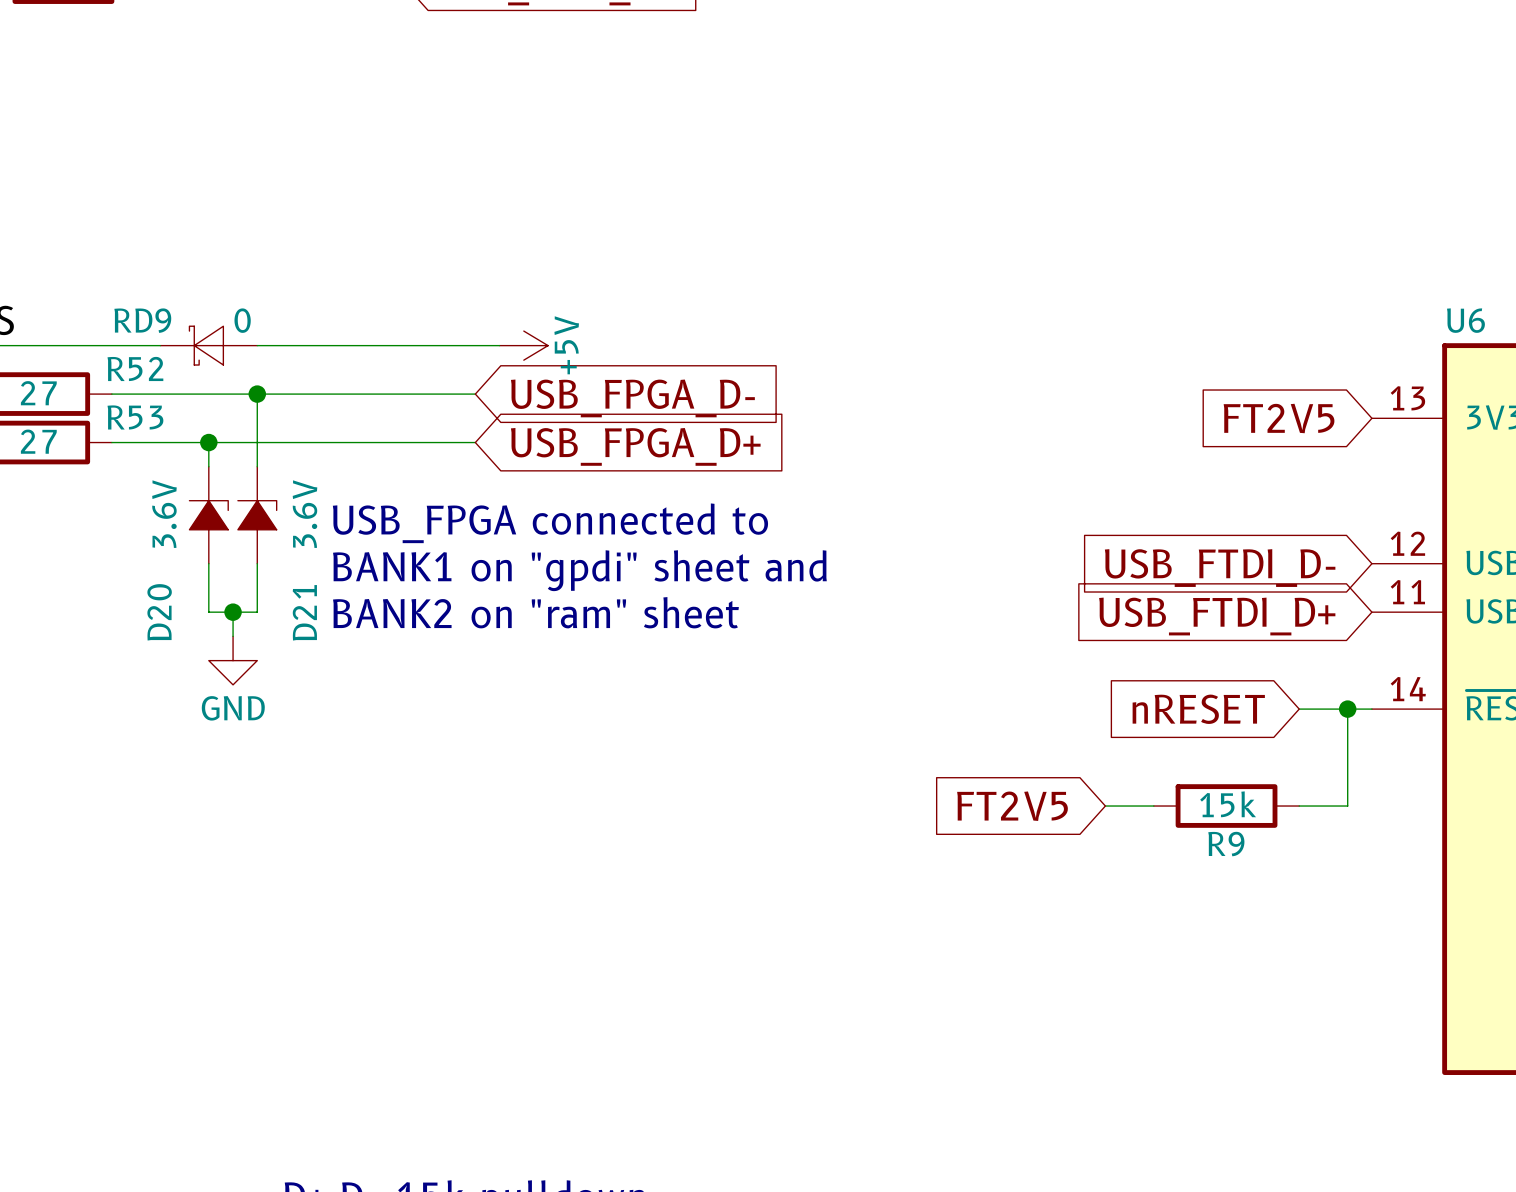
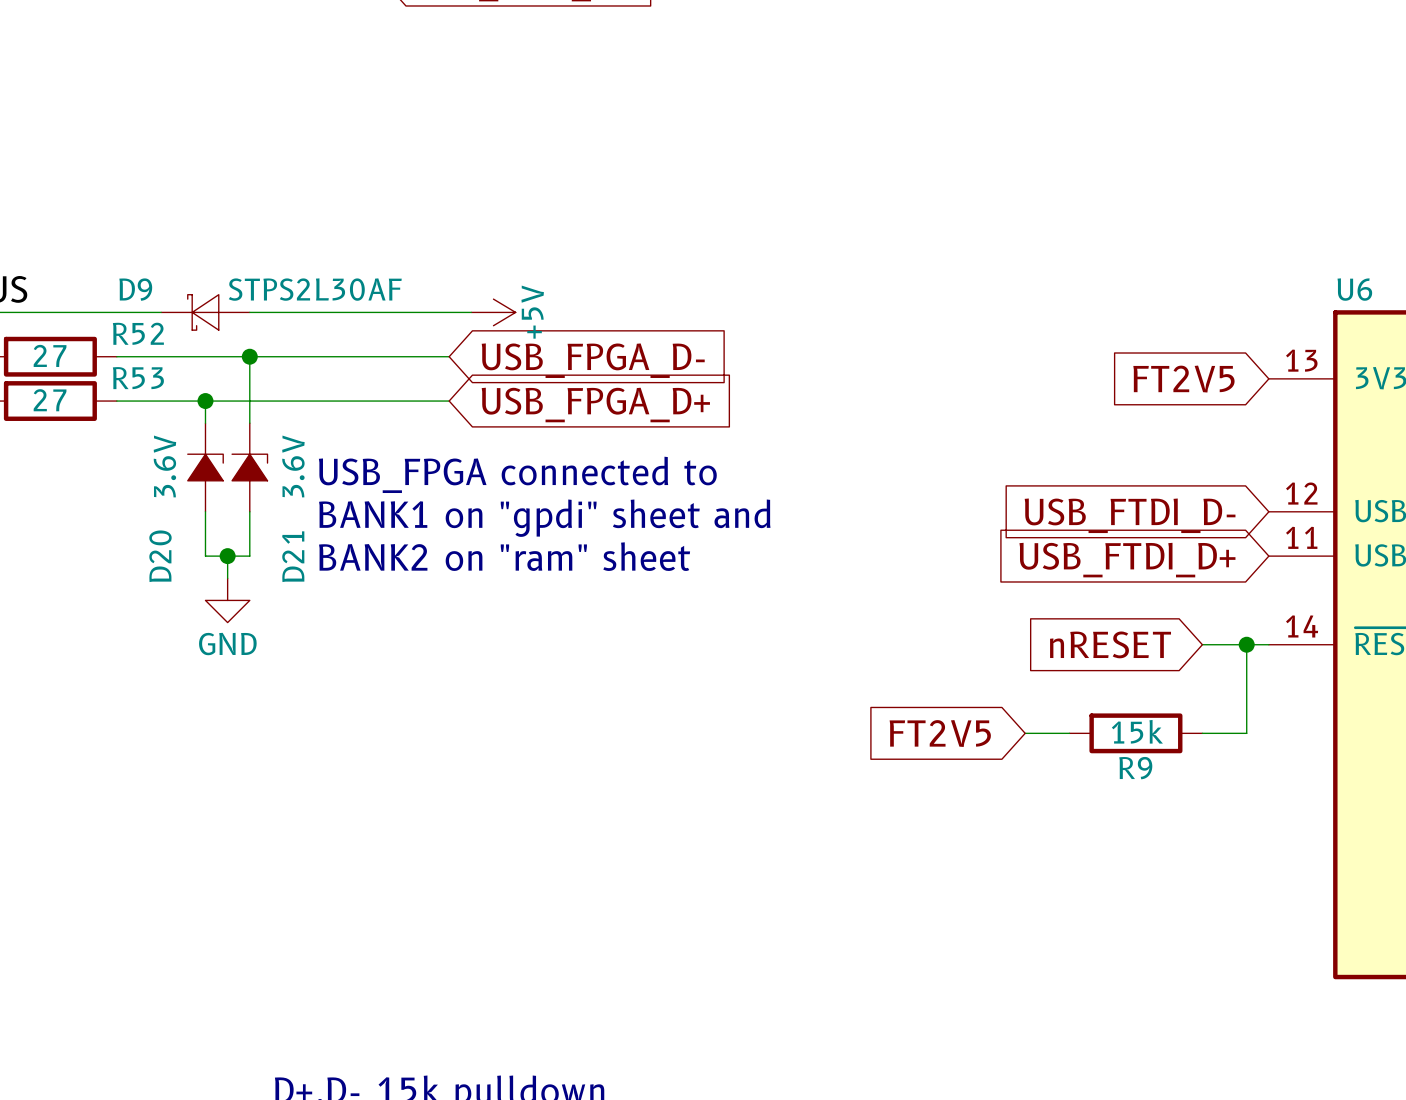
RD9 name: RD9 (142, 320) -> D9 (135, 289)
RD9 value: 0 (242, 320) -> STPS2L30AF (315, 289)

